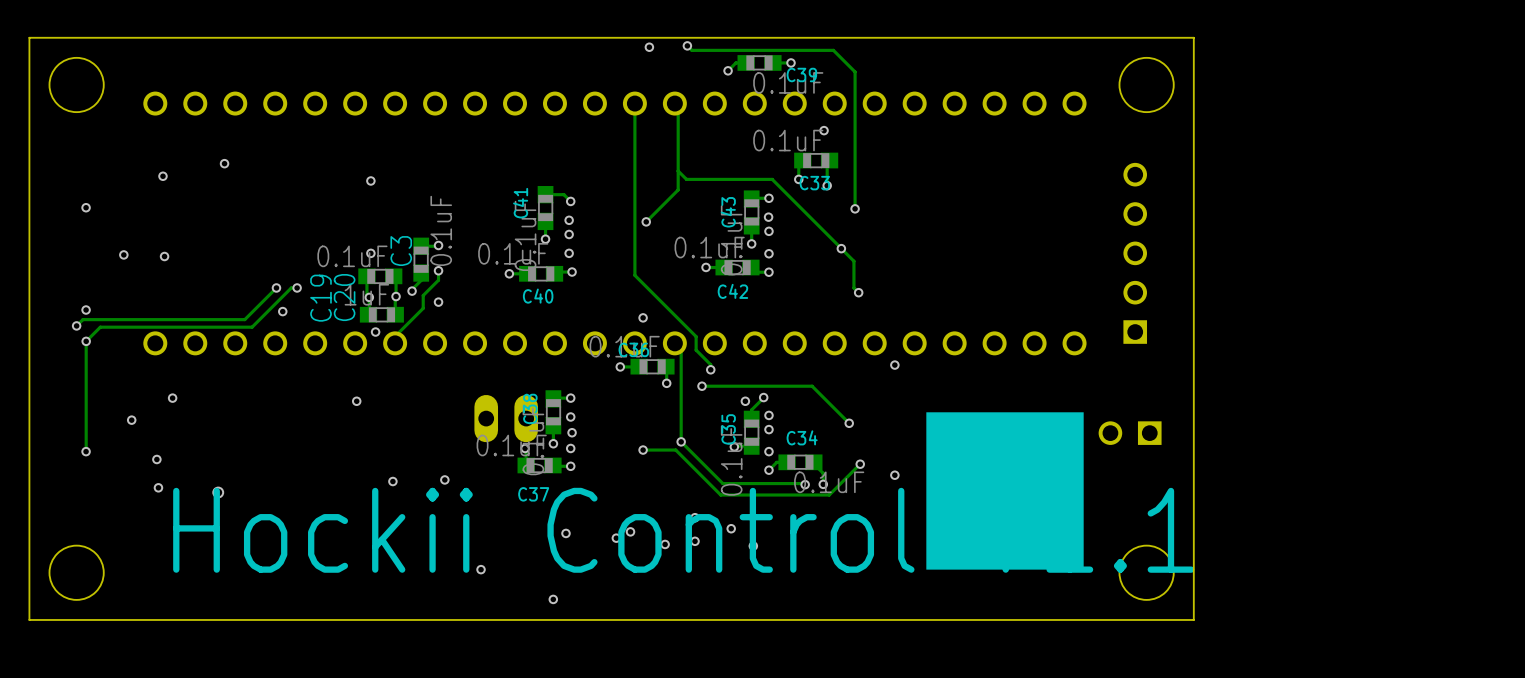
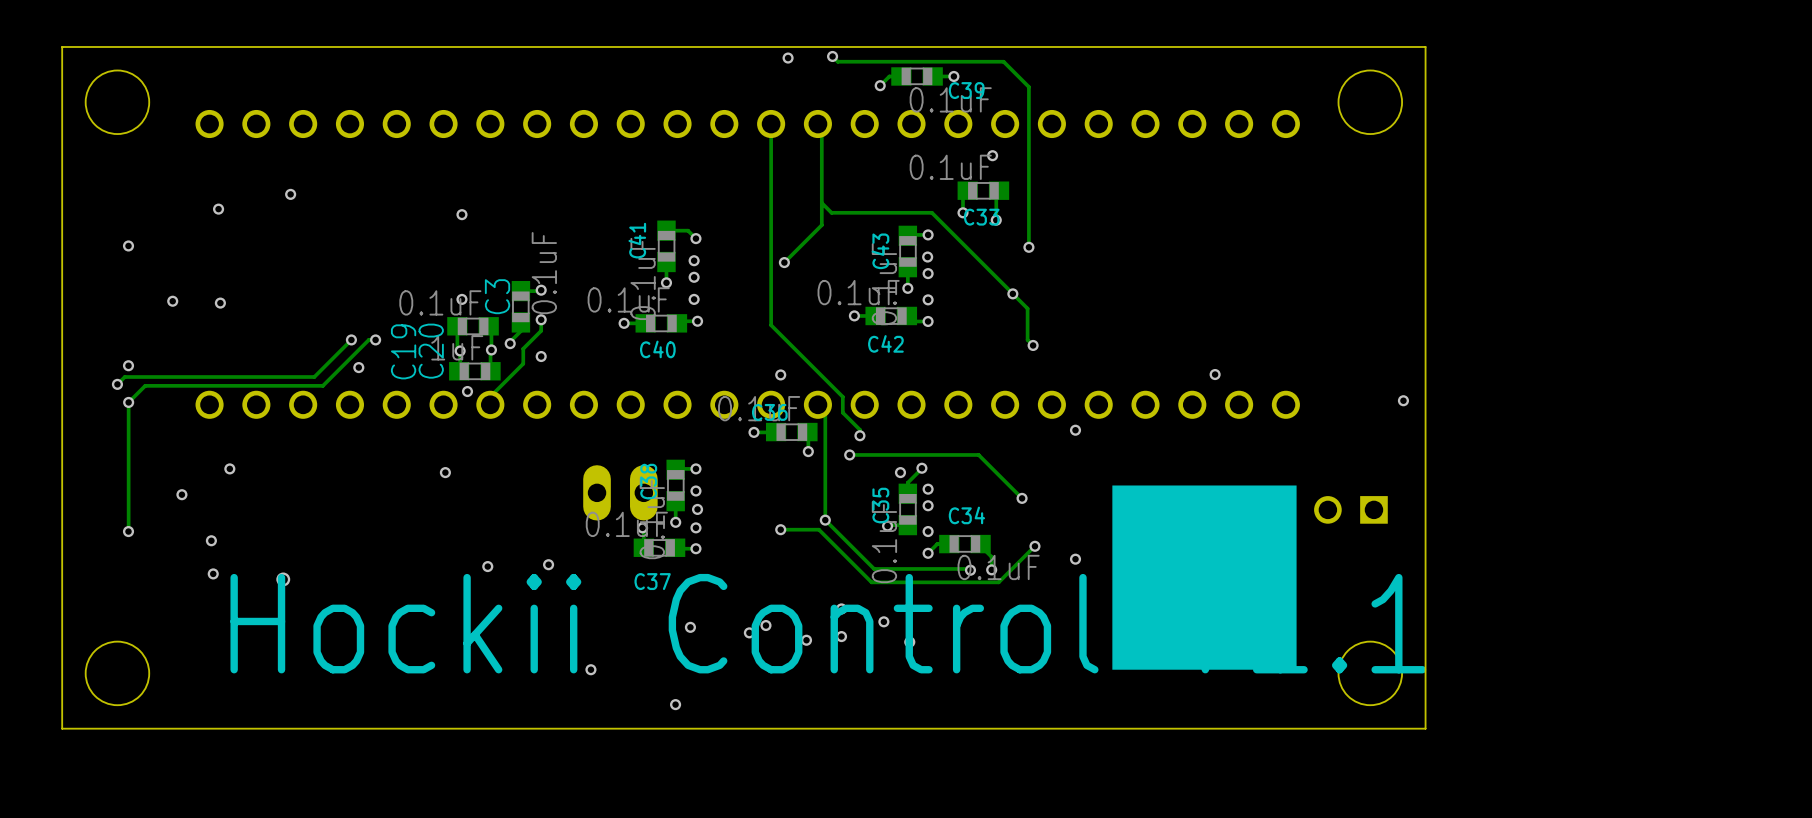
part: (1135, 253) -> none
via: none -> (1215, 374)
via: none -> (1403, 400)

